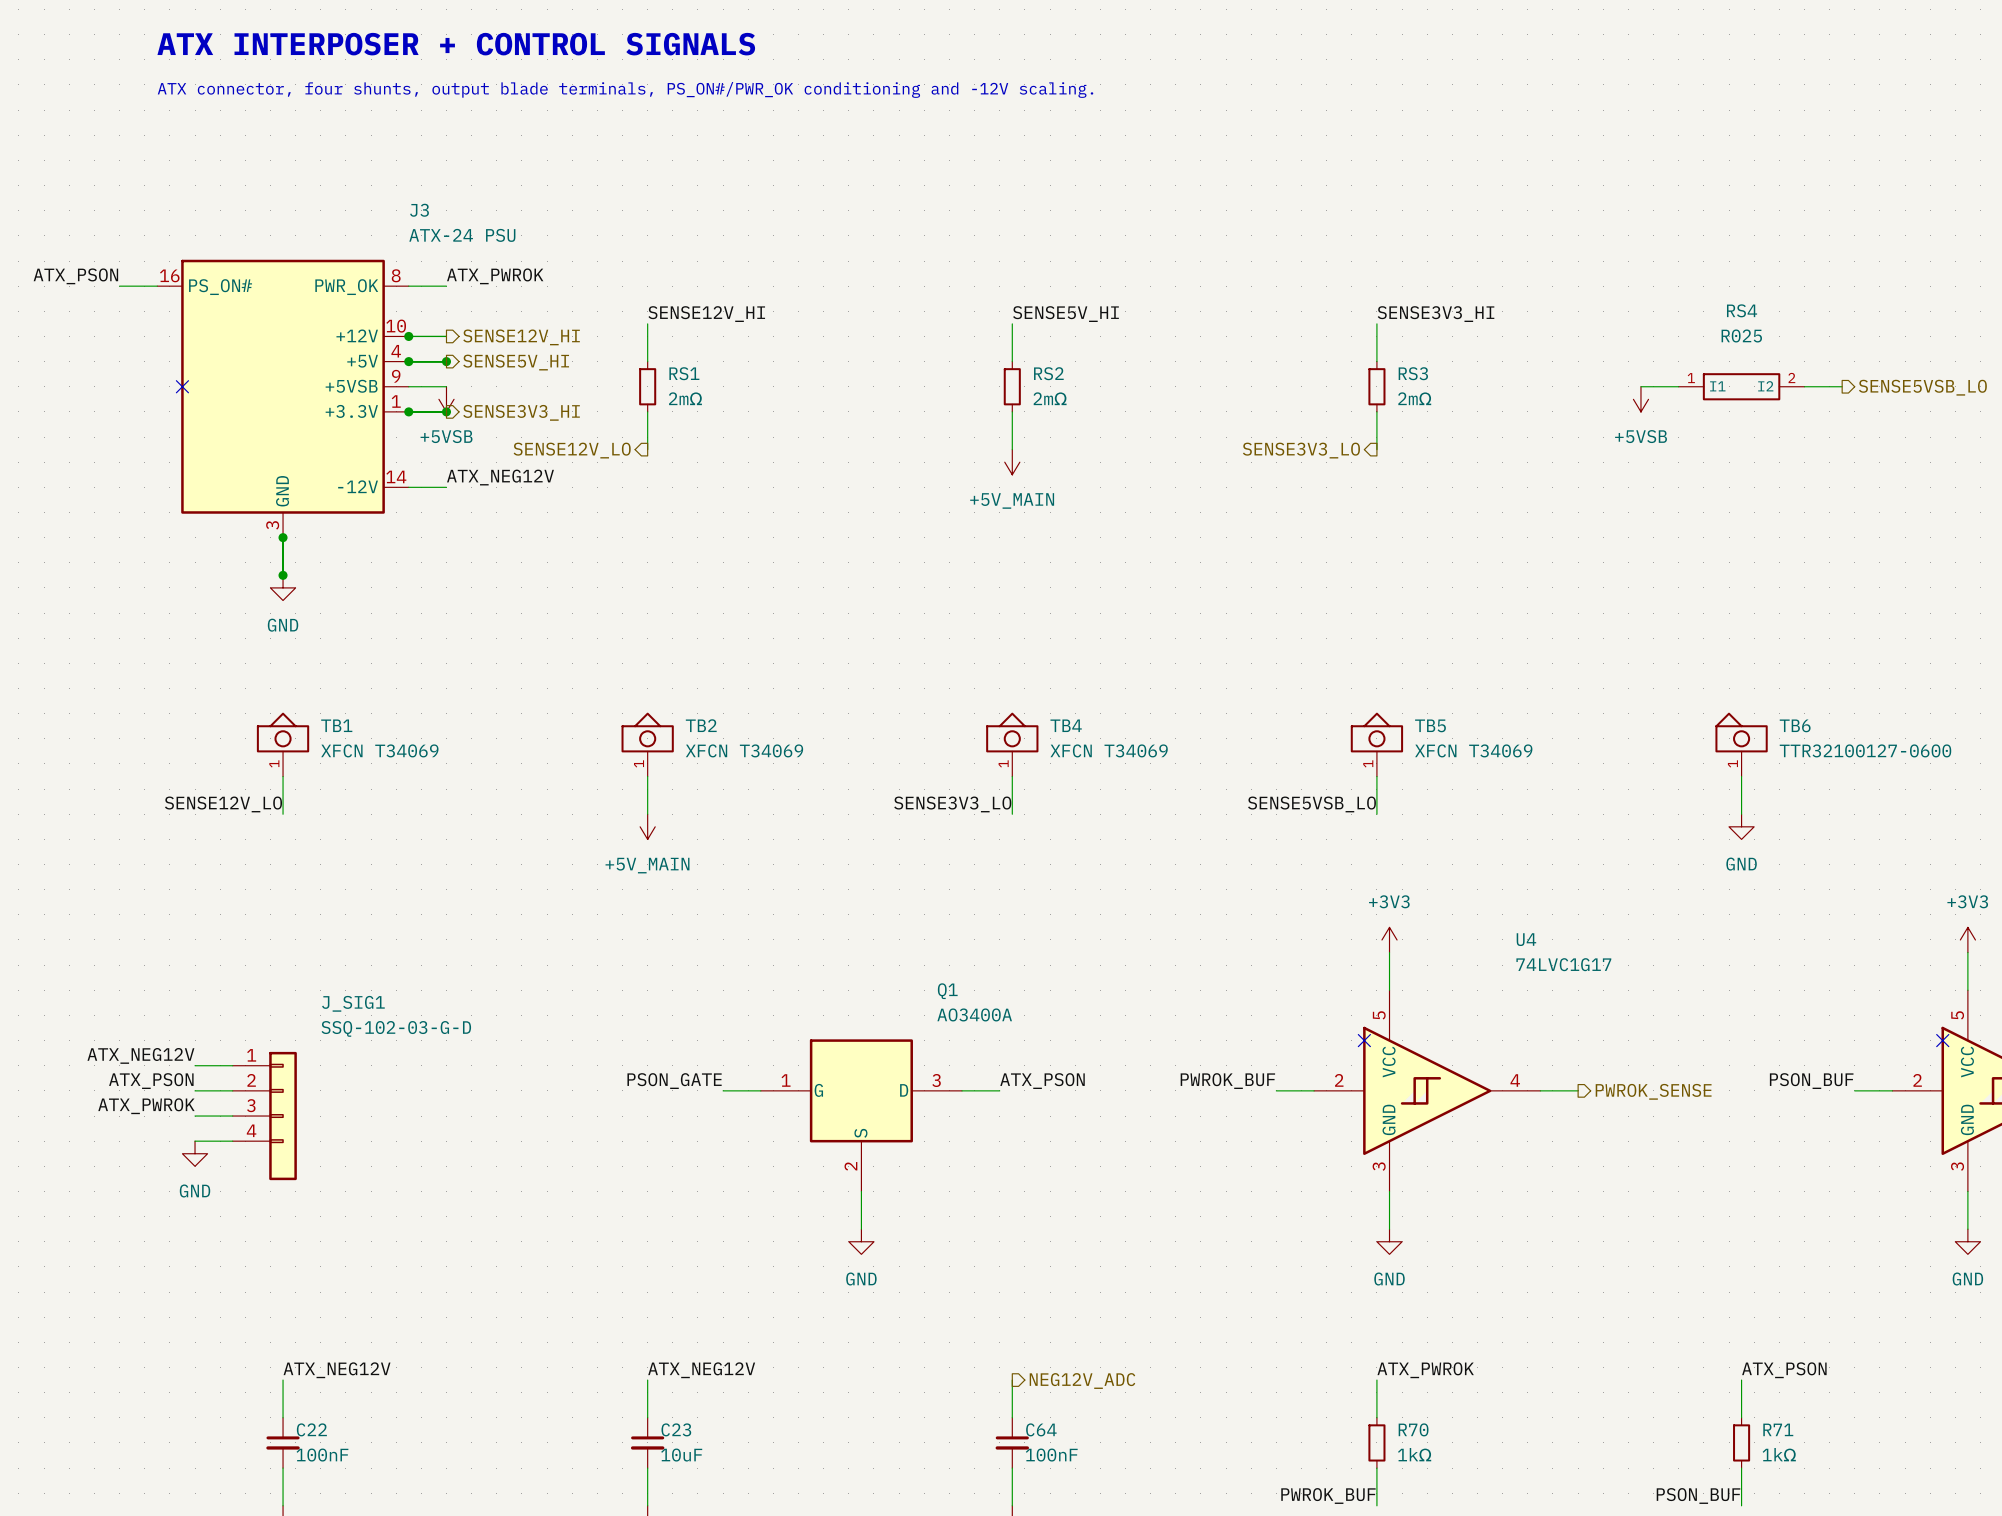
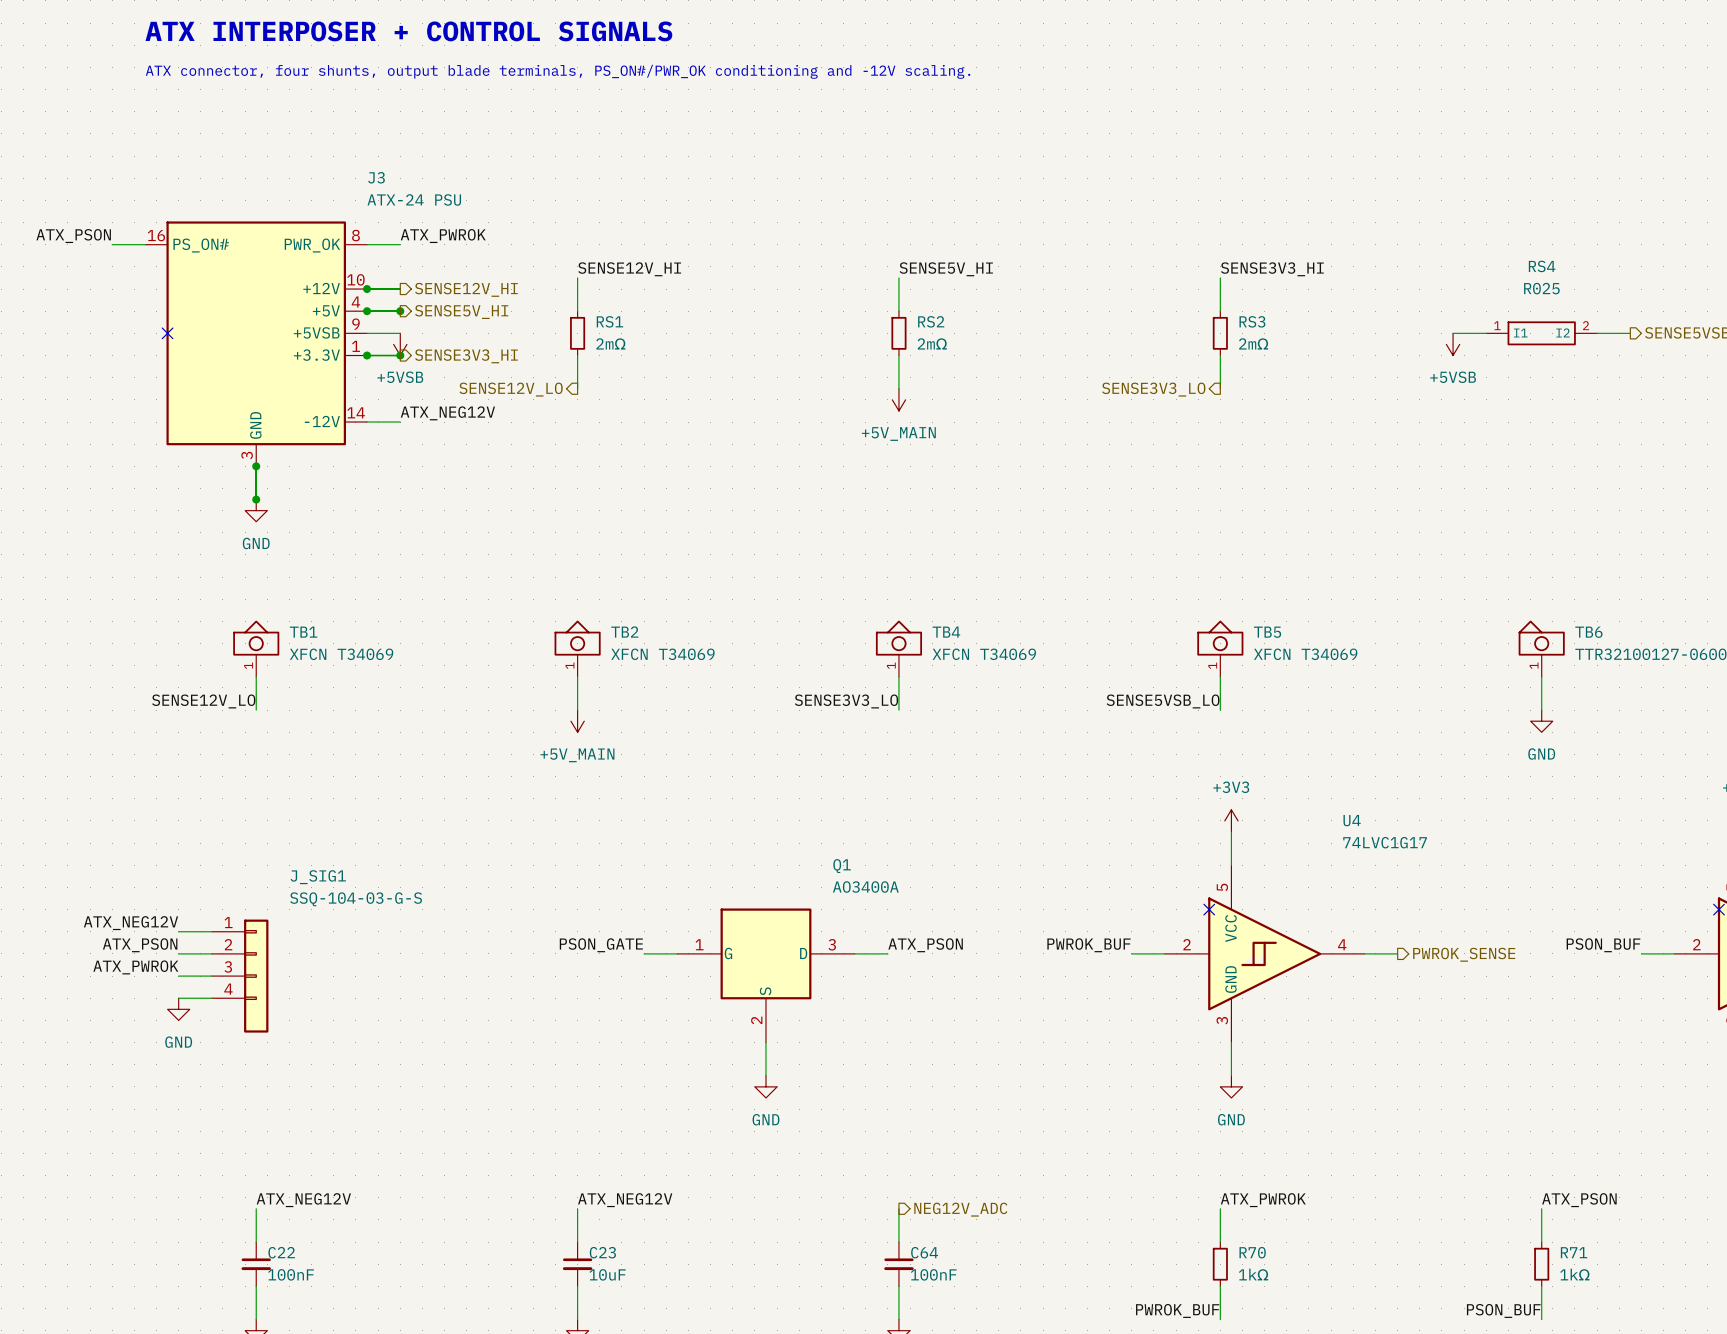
J_SIG1 value: SSQ-102-03-G-D (396, 1028) -> SSQ-104-03-G-S (356, 899)

